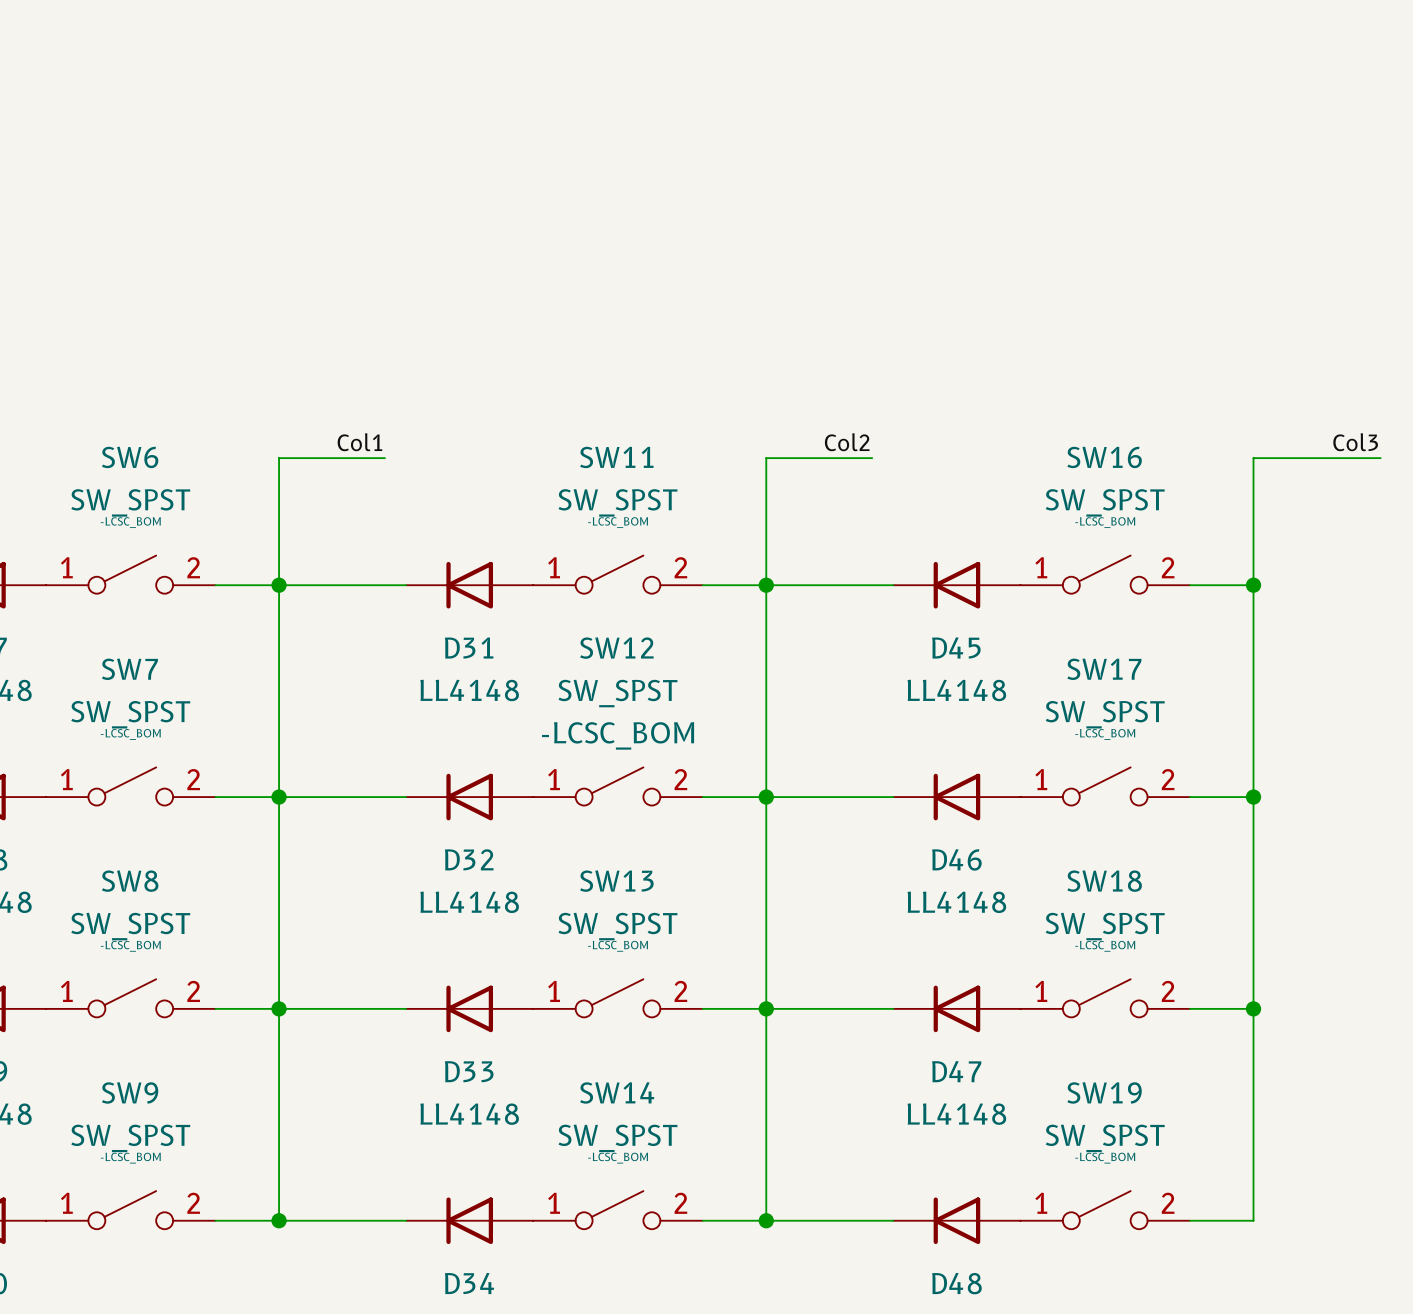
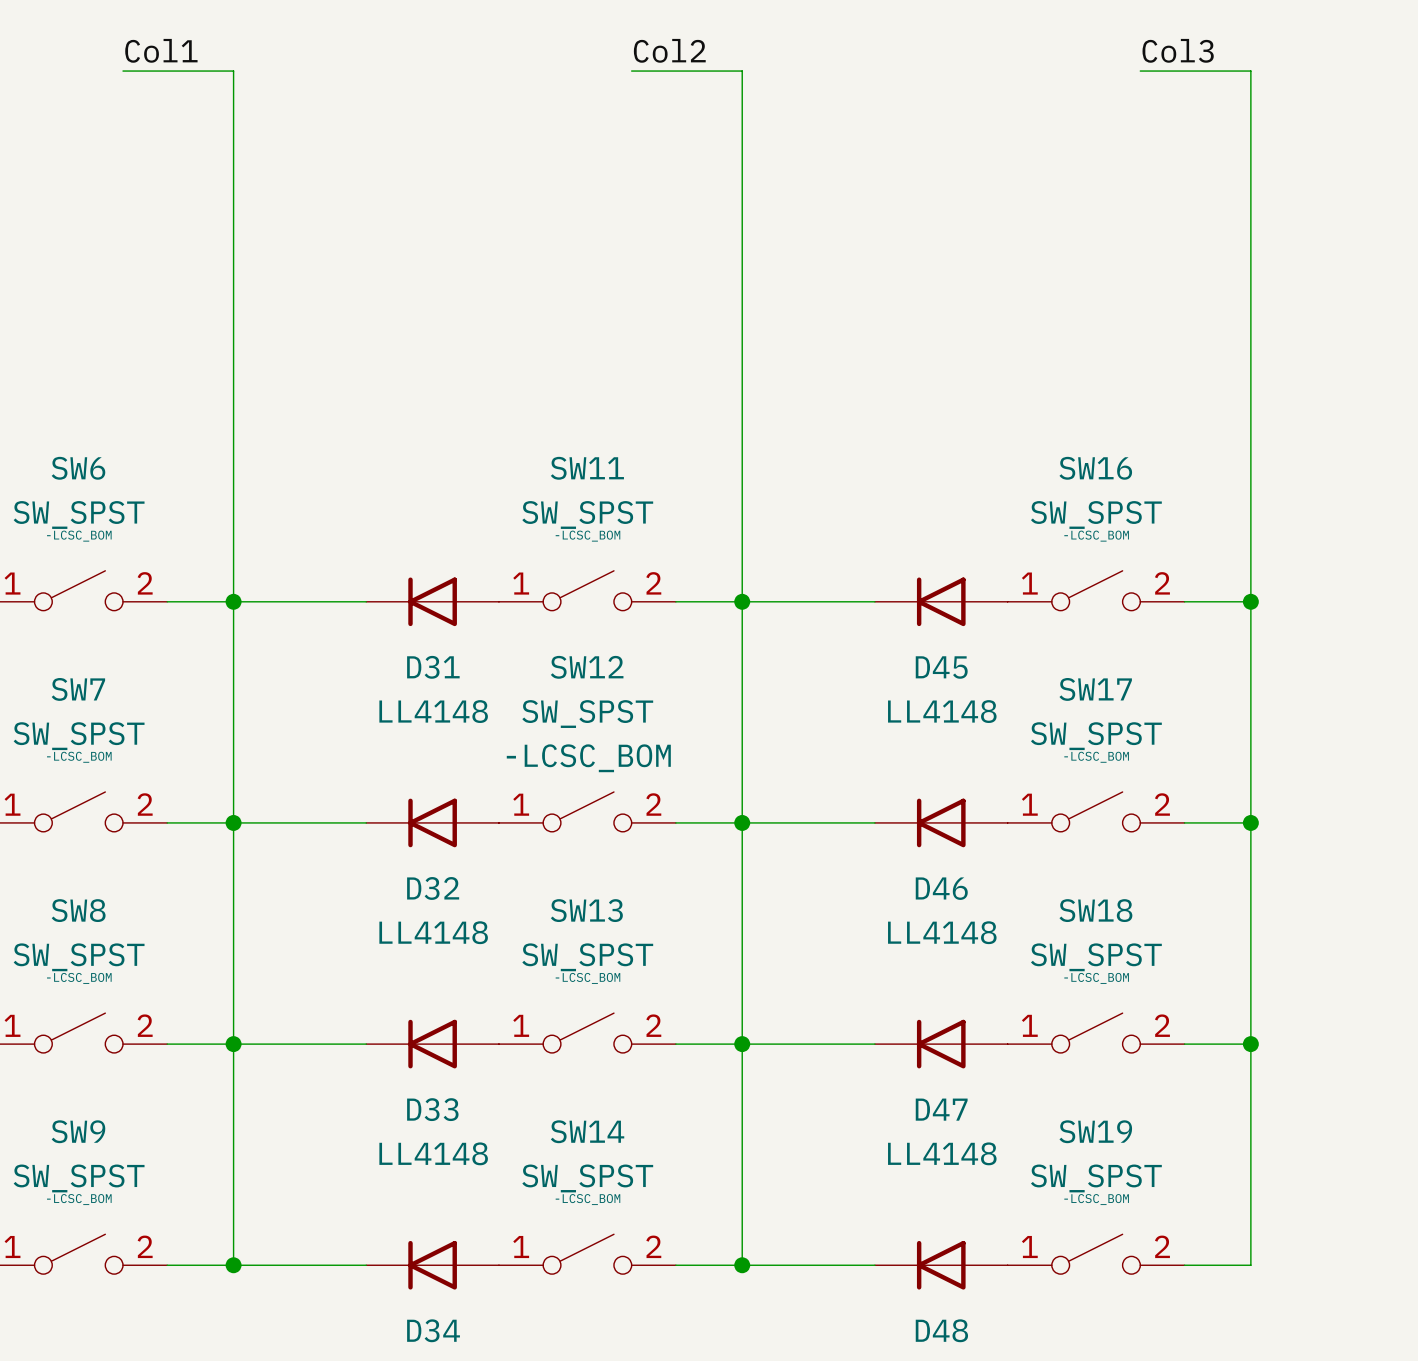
label: none -> Col1 (161, 50)
label: none -> Col2 (669, 50)
label: none -> Col3 (1178, 50)
label: Col1 (359, 442) -> none
label: Col2 (847, 442) -> none
label: Col3 (1355, 442) -> none
wire: (279, 458) (384, 458) -> (233, 469) (233, 71) (123, 71)
wire: (766, 458) (872, 458) -> (742, 469) (742, 71) (631, 71)
wire: (1253, 458) (1380, 458) -> (1250, 469) (1250, 71) (1140, 71)

